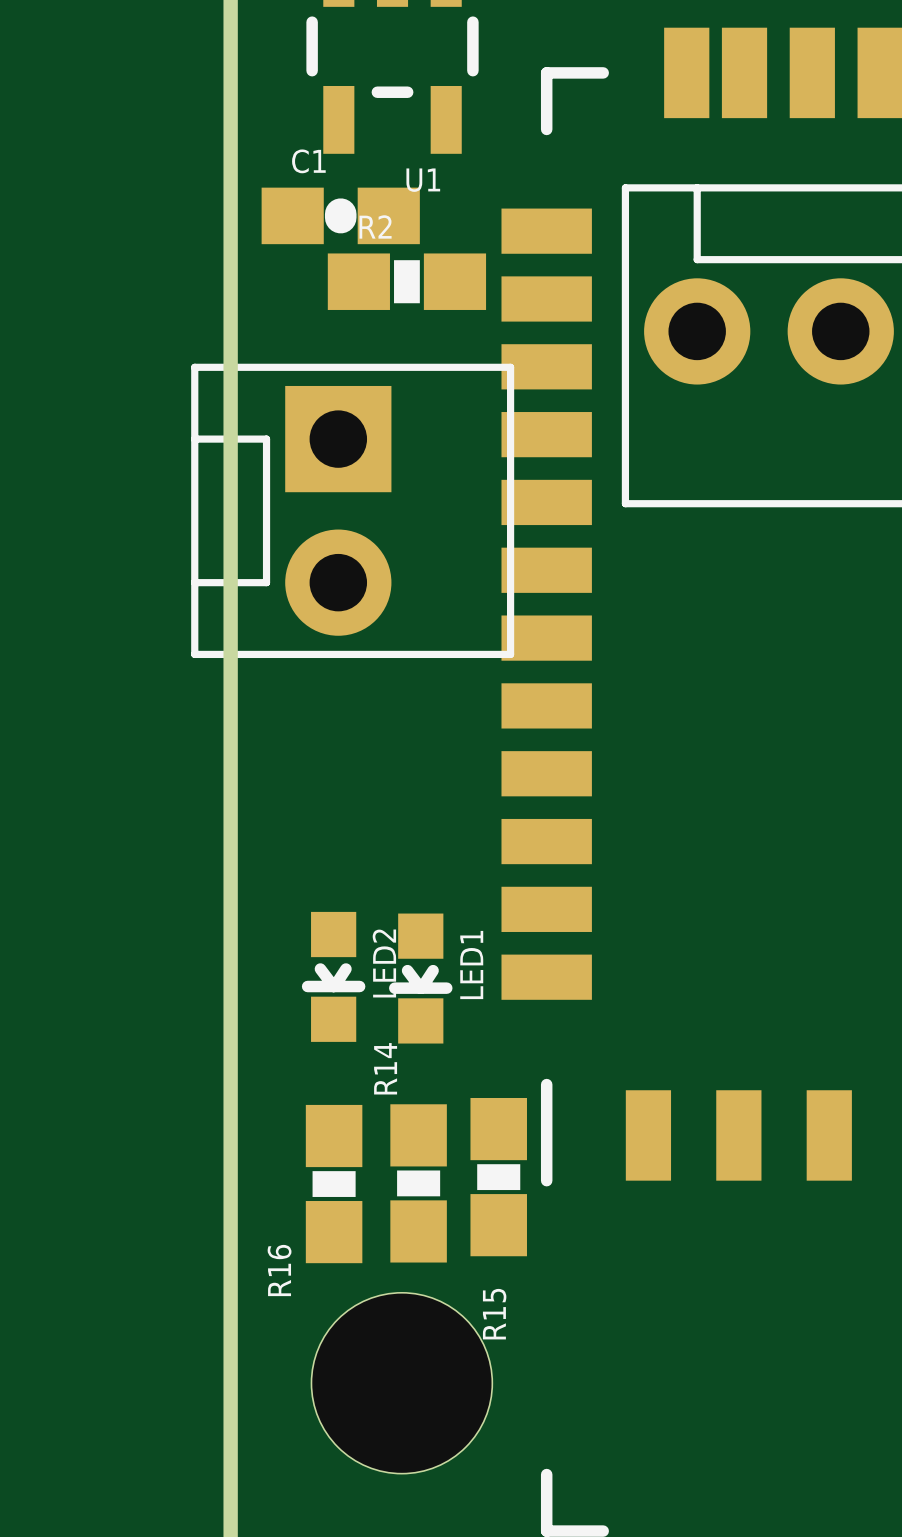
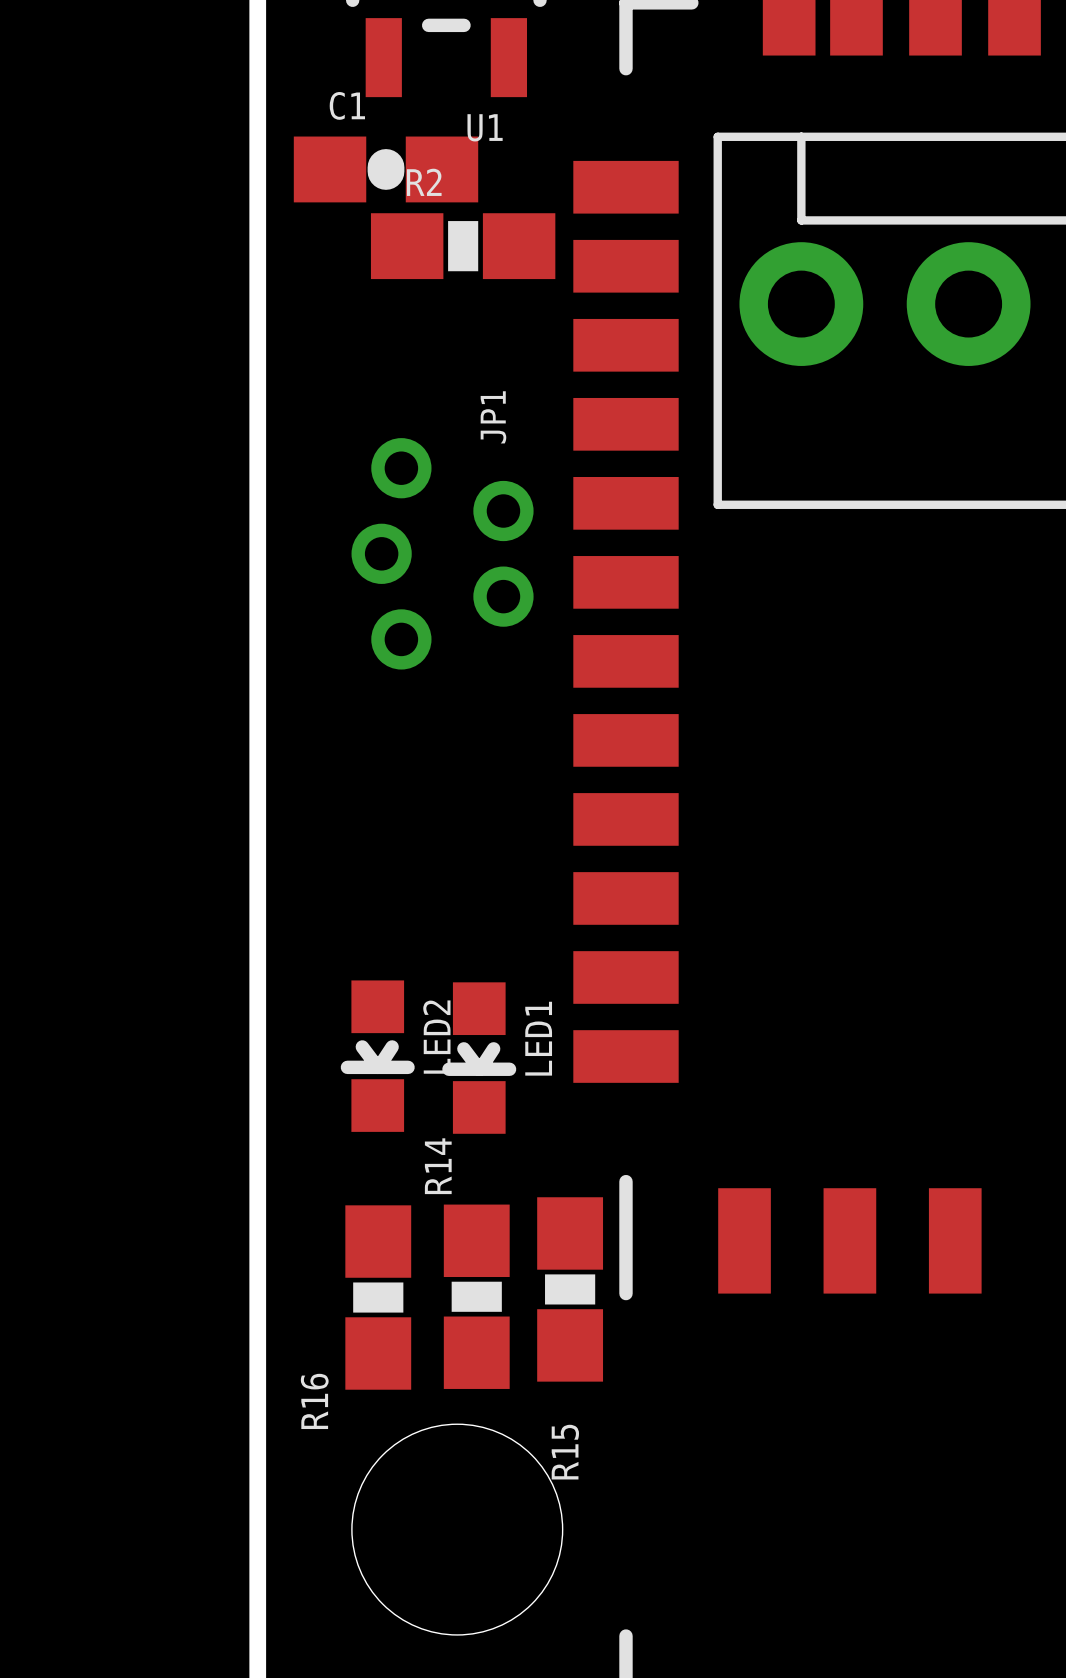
part: (352, 510) -> none
JP1: none -> (442, 553)

